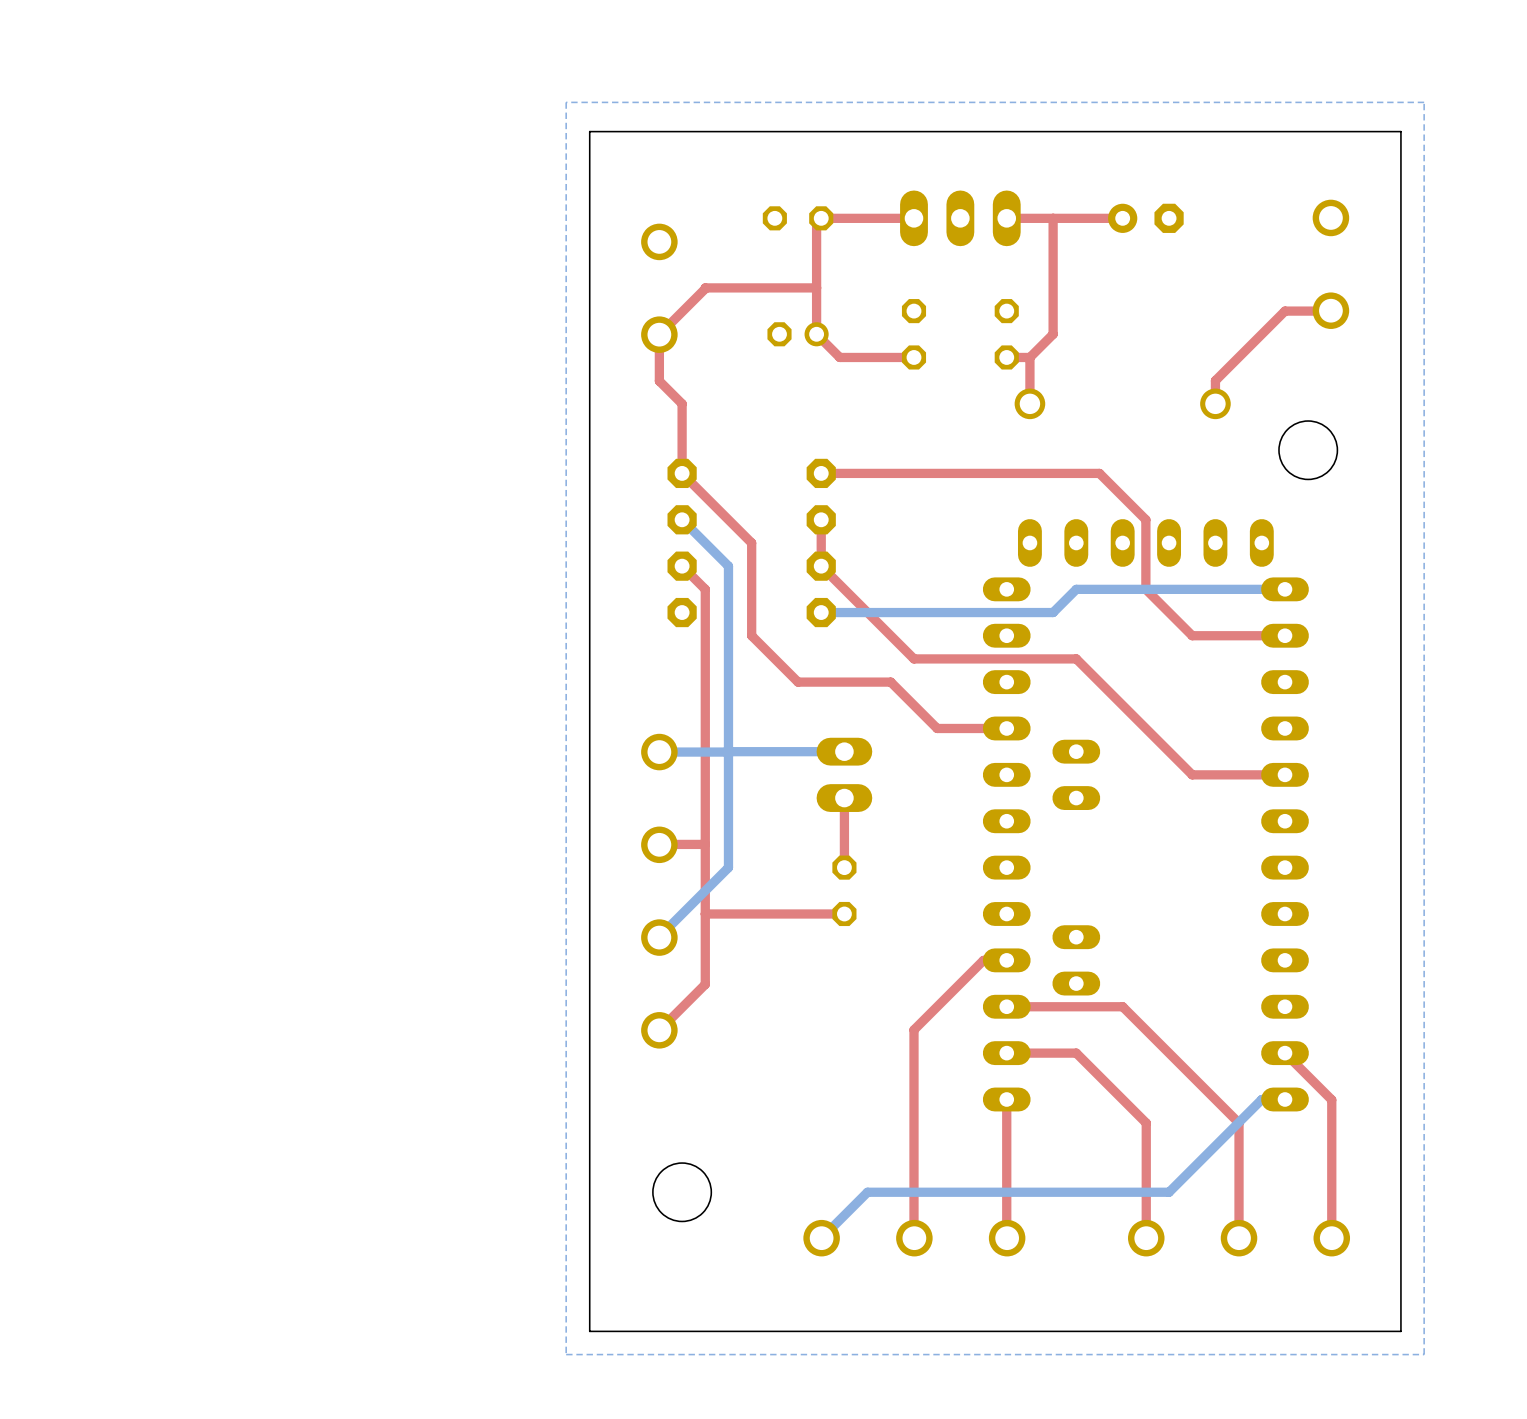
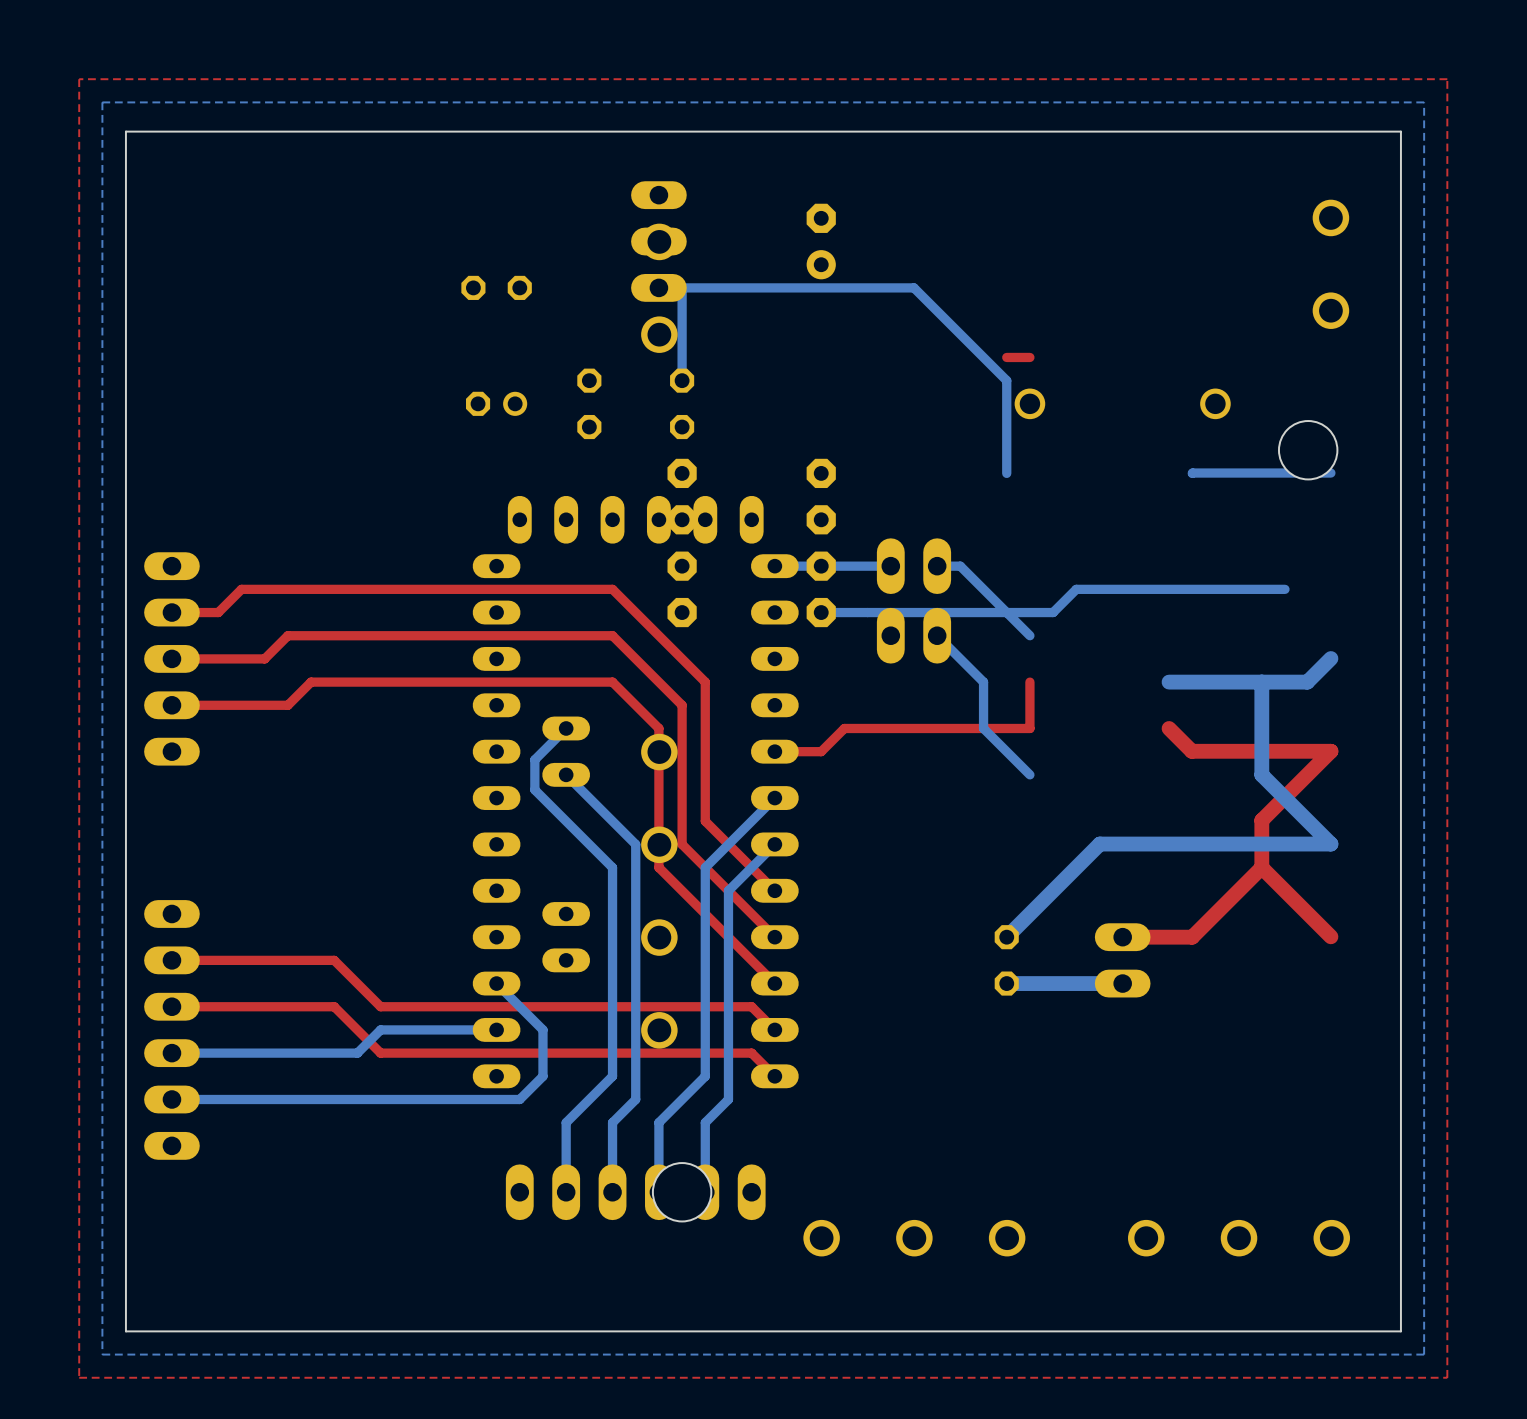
top zone outline: none -> (1447, 79) (1447, 1377) (79, 1377) (79, 79) (1447, 79)
bottom zone outline: (566, 102) (566, 1354) -> (566, 102) (102, 102) (102, 1354) (566, 1354)
board edge: (589, 131) (589, 1331) -> (589, 131) (125, 131) (125, 1331) (589, 1331)
part: (798, 218) -> none
top track: (913, 218) (821, 218) (816, 222) (816, 334) (839, 357) (913, 357) -> none
part rotation: 0° (960, 218) -> 90° clockwise (658, 241)
part position: (960, 218) -> (658, 241)
top track: (1053, 218) (1053, 334) (1029, 357) (1029, 403) -> none
top track: (1122, 218) (1006, 218) -> none
part rotation: 0° (1145, 218) -> 90° counterclockwise (821, 241)
part position: (1145, 218) -> (821, 241)
part: none -> (496, 287)
bottom track: none -> (658, 287) (913, 287) (1006, 380) (1006, 473)
bottom track: none -> (682, 287) (682, 380)
top track: (816, 287) (705, 287) (659, 334) (659, 381) (682, 403) (682, 473) (751, 542) (751, 635) (798, 682) (890, 682) (937, 728) -> (774, 751) (821, 751) (844, 728) (937, 728)
top track: (1330, 310) (1285, 311) (1215, 380) (1215, 403) -> none
part position: (798, 334) -> (496, 403)
part: (913, 334) -> none
part: (1006, 334) -> none
part: none -> (589, 403)
part: none -> (682, 403)
top track: (821, 473) (1099, 473) (1145, 519) (1145, 589) (1192, 635) (1285, 635) -> none
bottom track: none -> (1330, 473) (1192, 473)
bottom track: (682, 519) (728, 566) (728, 867) (659, 937) -> none
top track: (821, 519) (821, 566) (913, 658) (1076, 658) (1192, 774) (1285, 774) -> none
top track: (682, 566) (705, 589) (705, 682) -> (171, 612) (218, 612) (241, 589) (612, 589) (705, 682)
bottom track: none -> (890, 566) (774, 566)
part: none -> (913, 566)
bottom track: none -> (937, 566) (960, 566) (1029, 635)
part: none -> (913, 635)
bottom track: none -> (937, 635) (983, 682) (983, 728) (1029, 774)
top track: none -> (171, 658) (264, 658) (287, 635) (612, 635) (682, 705) (682, 844) (774, 937)
part: none -> (171, 658)
bottom track: none -> (1330, 658) (1307, 682) (1169, 682)
top track: none -> (1029, 682) (1029, 728) (1006, 728)
bottom track: none -> (1261, 682) (1261, 774) (1330, 844) (1099, 844) (1006, 937)
top track: none -> (171, 705) (287, 705) (311, 682) (612, 682) (658, 728) (658, 867) (774, 983)
bottom track: none -> (566, 728) (534, 759) (534, 789) (612, 867) (612, 1076) (566, 1122) (566, 1192)
top track: none -> (1169, 728) (1191, 751) (1330, 751) (1261, 820) (1261, 867)
bottom track: (844, 751) (659, 752) -> none
bottom track: none -> (566, 774) (635, 844) (635, 1099) (612, 1122) (612, 1192)
part: (844, 774) -> none
part: none -> (635, 792)
bottom track: none -> (774, 798) (705, 867) (705, 1076) (658, 1122) (658, 1192)
top track: (844, 798) (844, 867) -> none
part: (1145, 815) -> none
top track: (705, 821) (705, 984) (659, 1030) -> (705, 821) (774, 890)
top track: (705, 844) (659, 844) -> none
bottom track: none -> (774, 844) (728, 890) (728, 1099) (705, 1122) (705, 1192)
top track: none -> (1261, 867) (1330, 936)
top track: none -> (1261, 867) (1192, 937) (1122, 937)
part position: (844, 890) -> (1006, 960)
top track: (844, 913) (705, 913) -> none
top track: none -> (171, 960) (334, 960) (380, 1006) (751, 1006) (774, 1029)
top track: (1006, 960) (983, 960) (913, 1029) (914, 1238) -> none
part: none -> (1122, 960)
bottom track: none -> (496, 983) (542, 1029) (542, 1076) (519, 1099) (171, 1099)
bottom track: none -> (1122, 983) (1006, 983)
top track: none -> (171, 1006) (334, 1006) (380, 1053) (751, 1053) (774, 1076)
top track: (1006, 1006) (1122, 1006) (1239, 1123) (1239, 1238) -> none
part: none -> (171, 1029)
bottom track: none -> (496, 1029) (380, 1029) (357, 1053) (171, 1053)
top track: (1006, 1053) (1076, 1053) (1146, 1123) (1146, 1238) -> none
top track: (1285, 1053) (1331, 1099) (1331, 1238) -> none
top track: (1006, 1099) (1007, 1238) -> none
bottom track: (1285, 1099) (1261, 1099) (1169, 1192) (867, 1192) (821, 1238) -> none
part: none -> (635, 1192)

